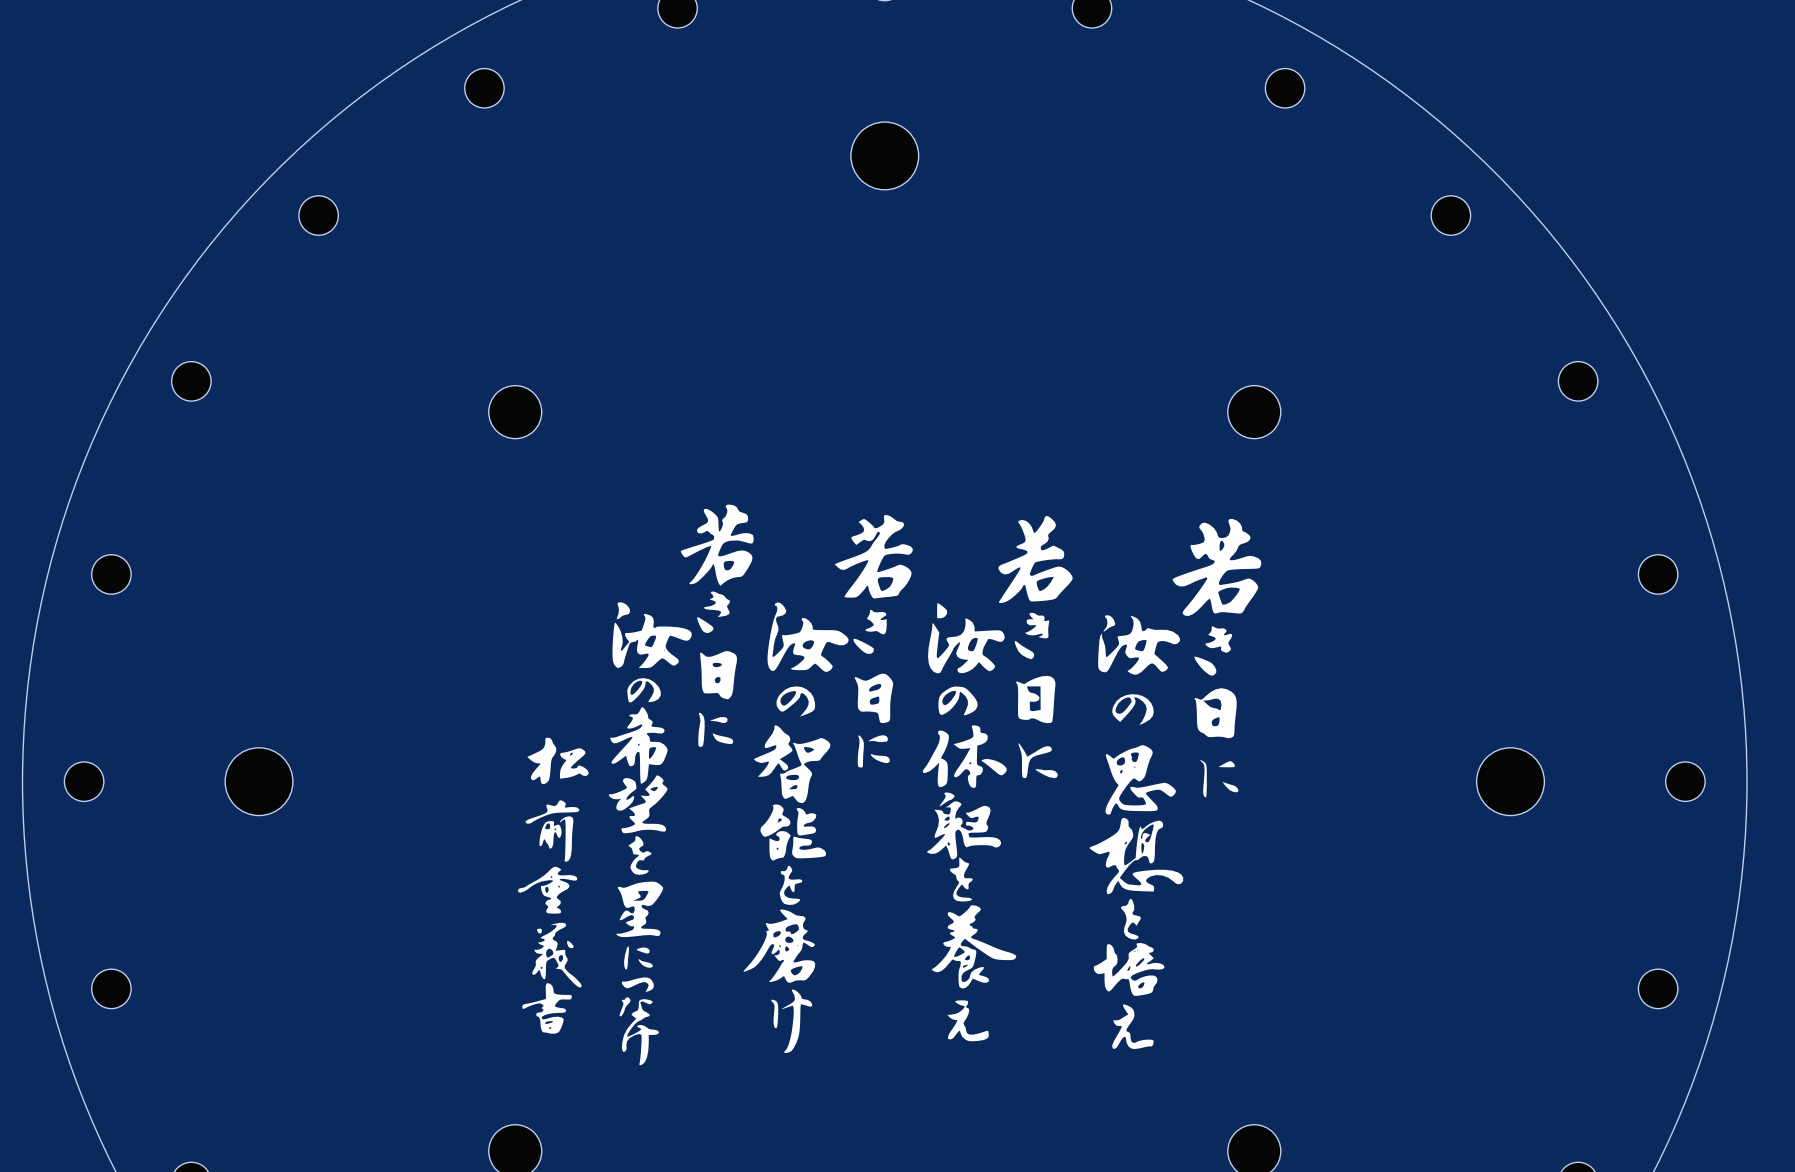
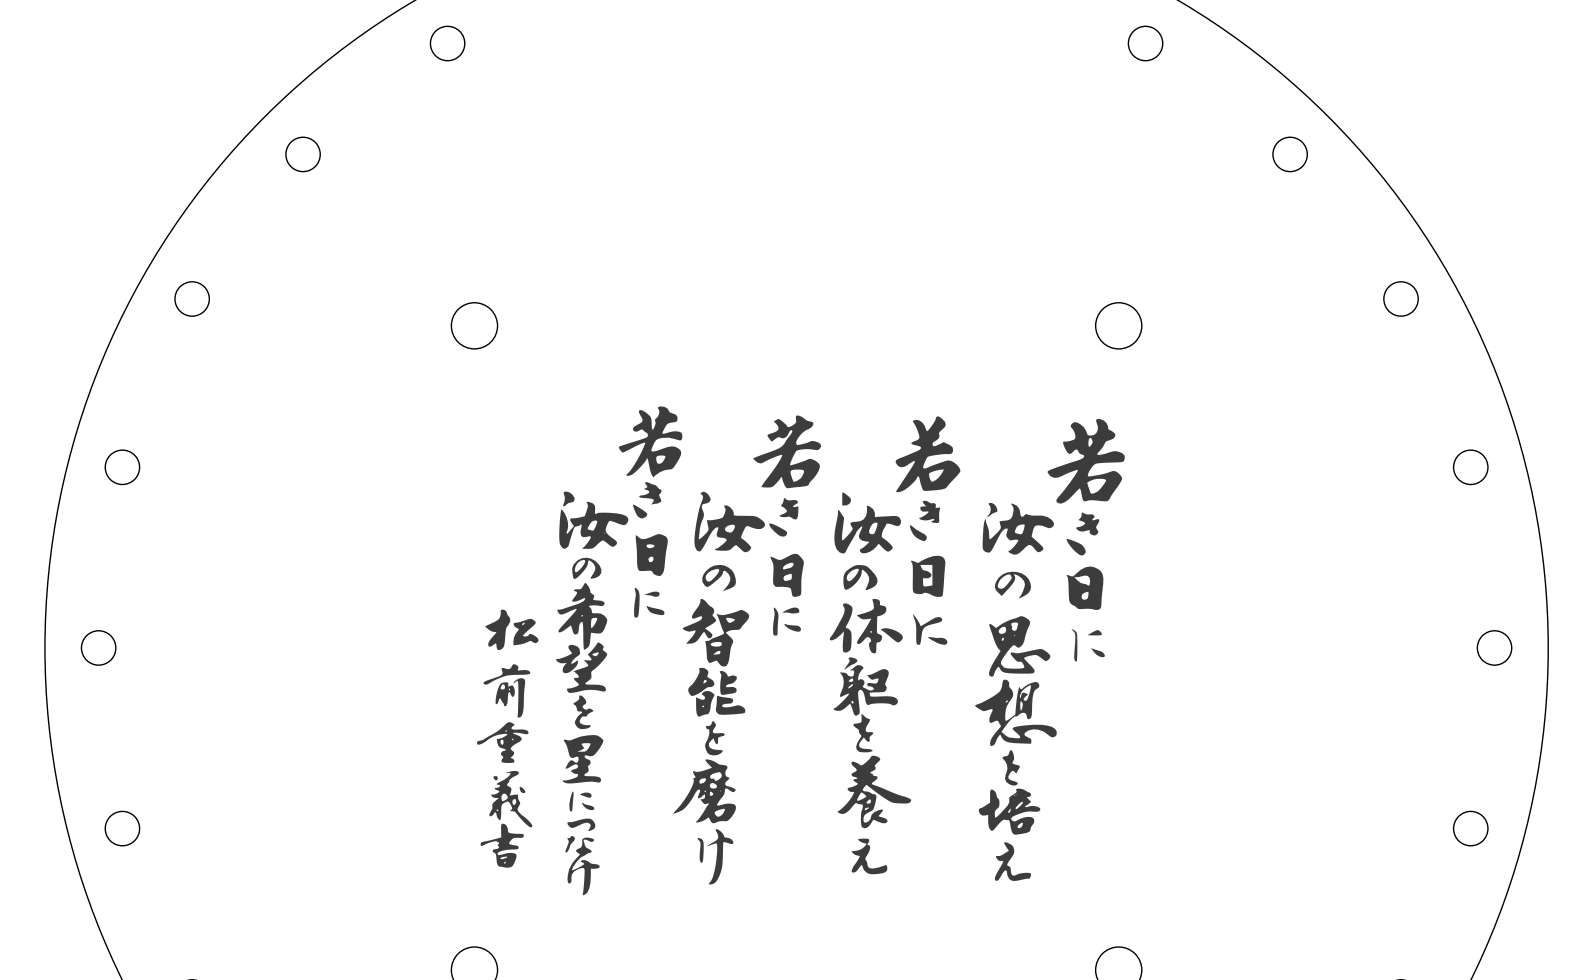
part: (884, 155) -> none
part: (259, 781) -> none
part: (1510, 781) -> none

